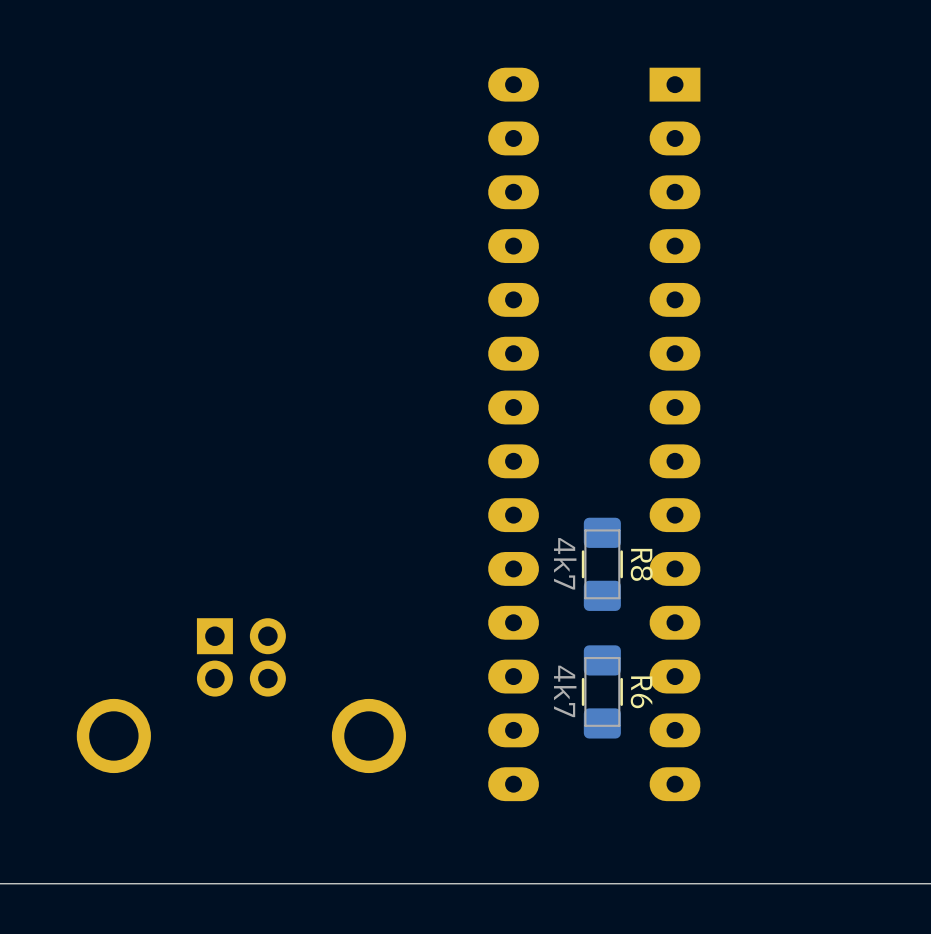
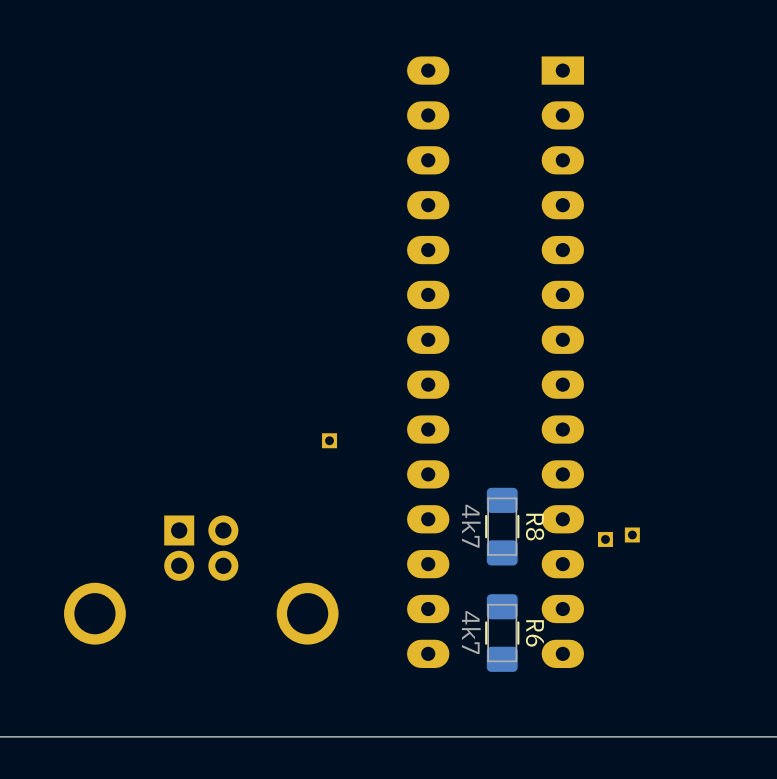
part: none -> (329, 440)
R8 position: (602, 564) -> (502, 526)
part: none -> (632, 534)
part: none -> (605, 539)
R6 position: (602, 691) -> (502, 633)

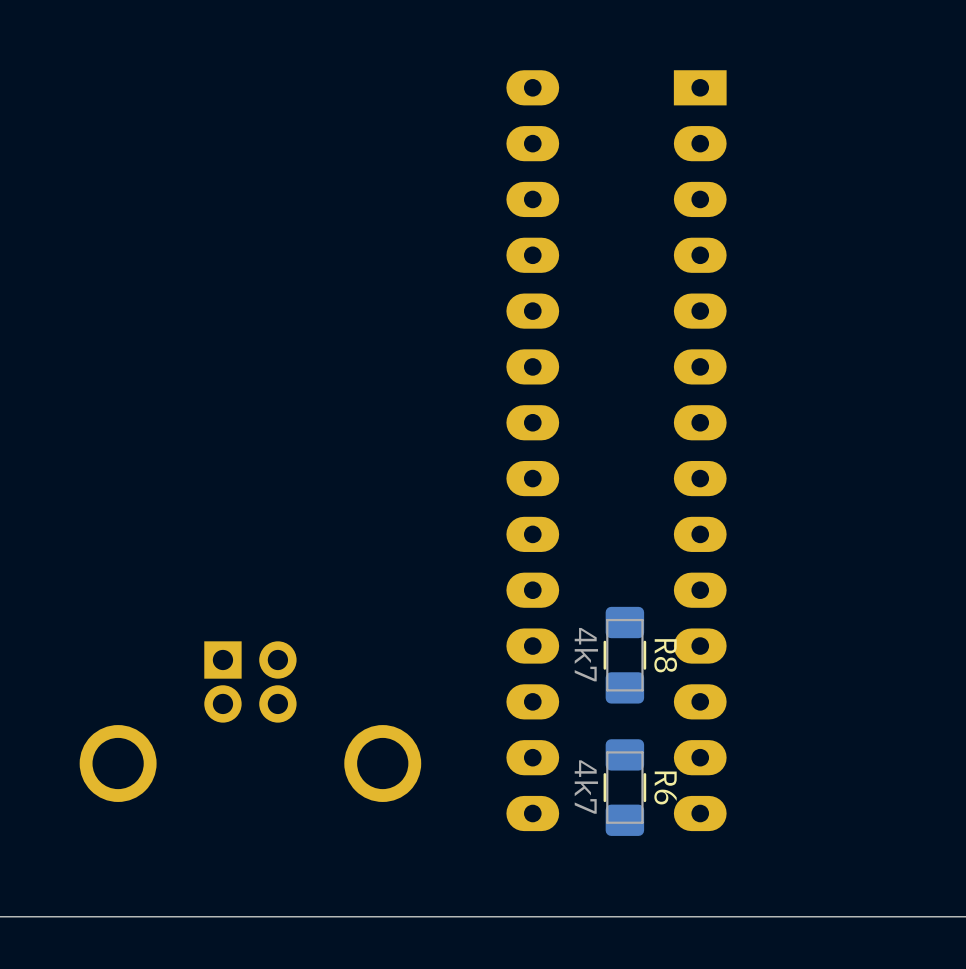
part: (329, 440) -> none
part: (632, 534) -> none
part: (605, 539) -> none

